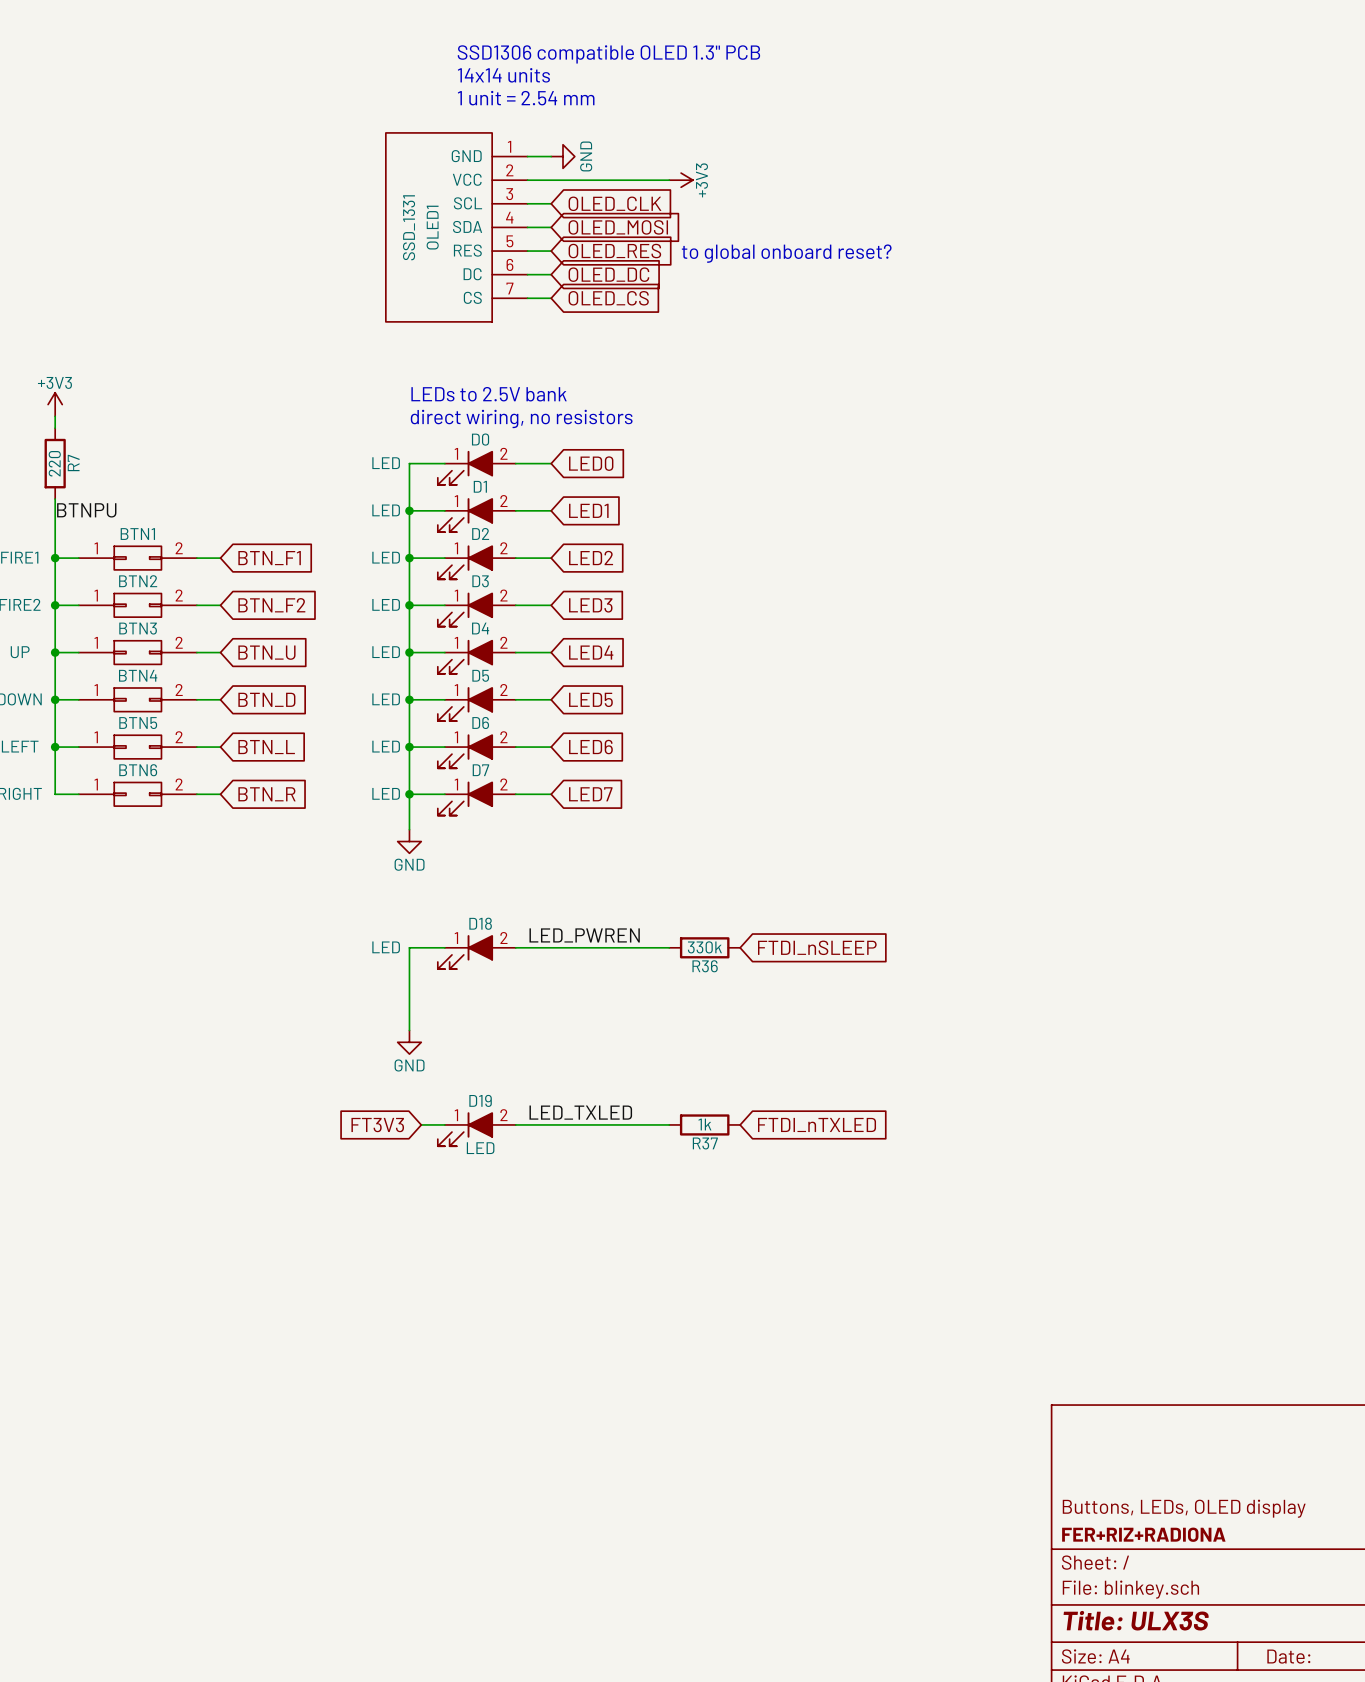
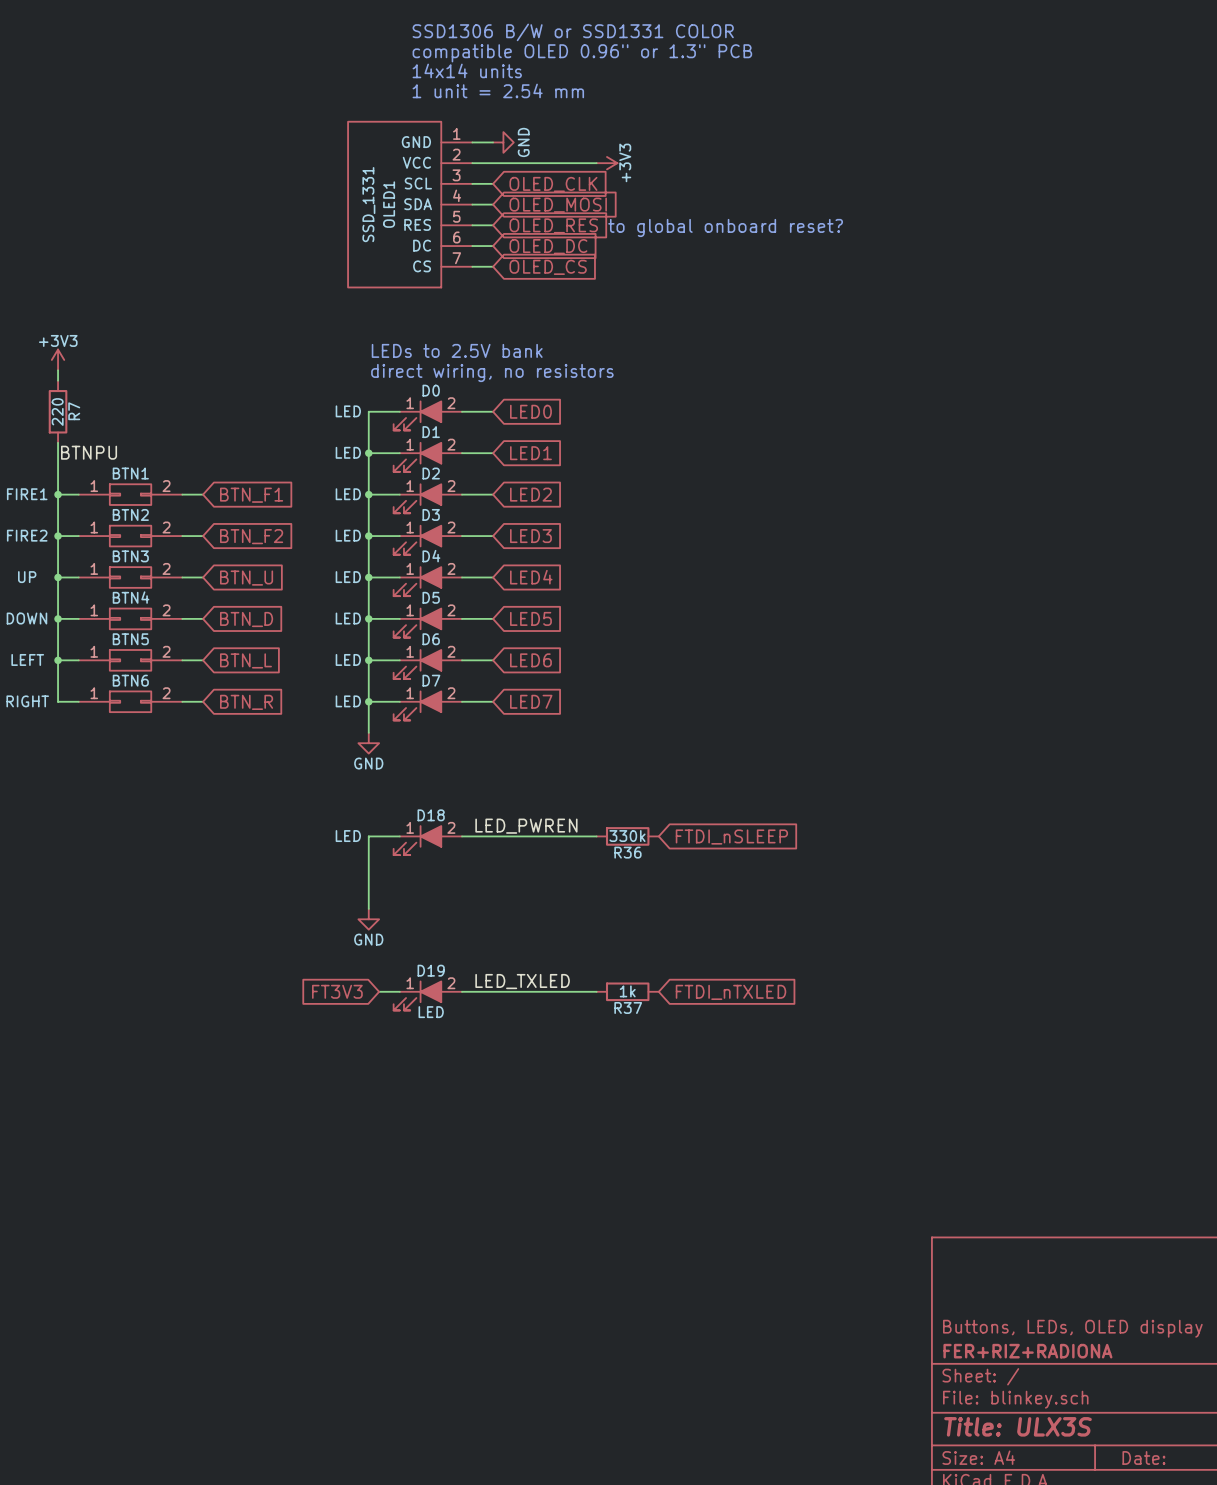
text: none -> SSD1306 B/W or SSD1331 COLOR (573, 32)
text: SSD1306 compatible OLED 1.3" PCB (608, 54) -> compatible OLED 0.96" or 1.3" PCB (582, 53)

